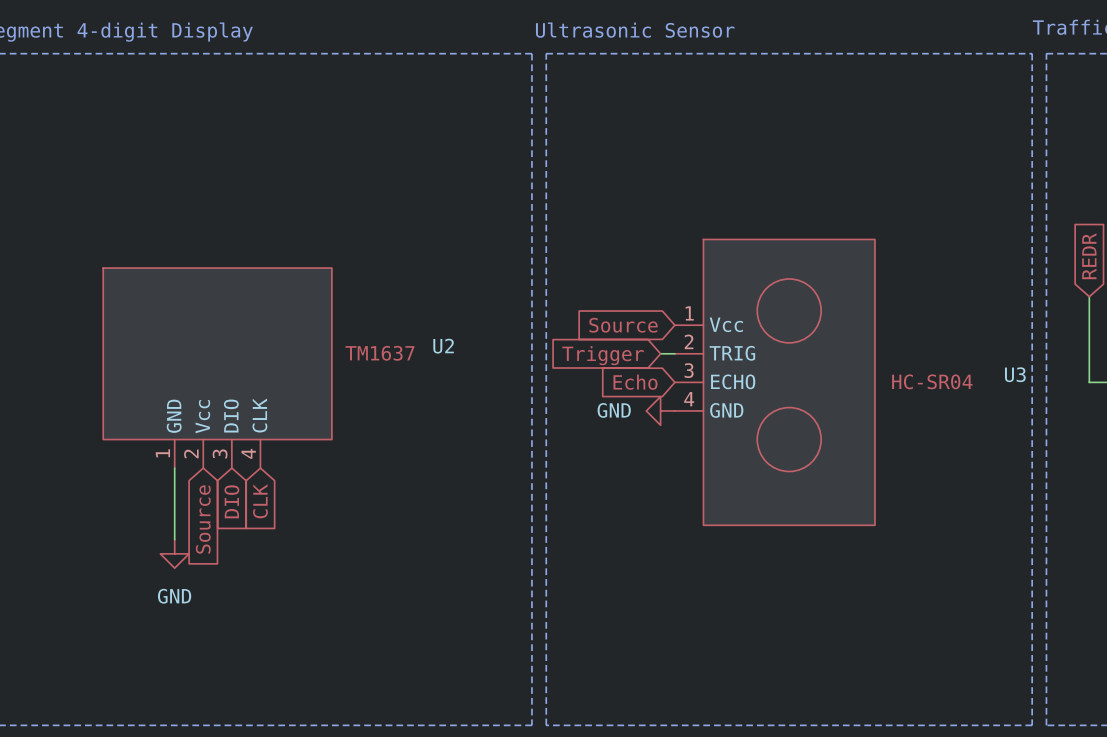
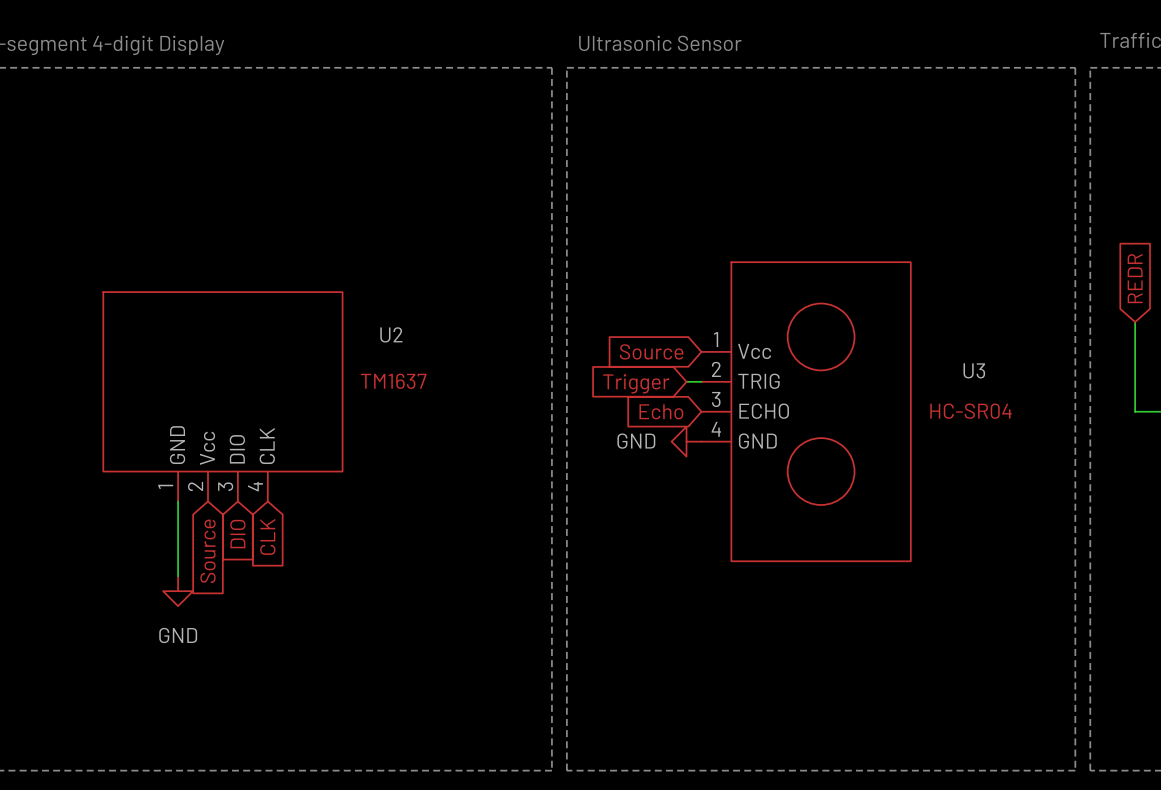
U2 name position: U2 (443, 346) -> U2 (391, 334)
U3 name position: U3 (1015, 374) -> U3 (974, 370)

